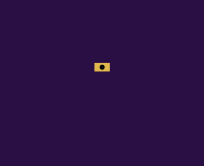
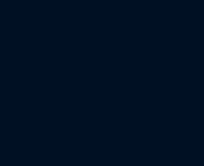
part: (102, 67) -> none

